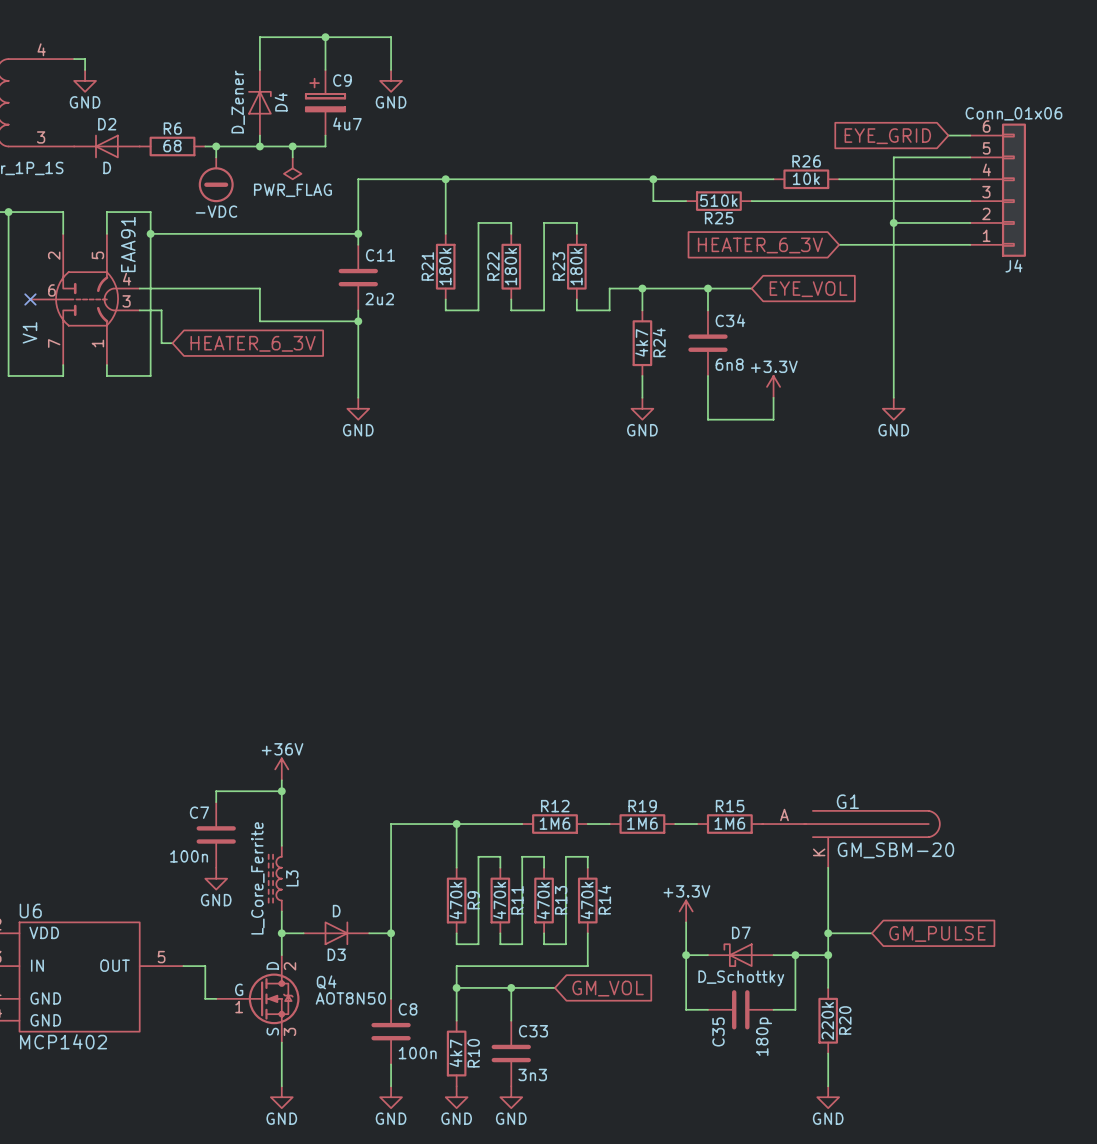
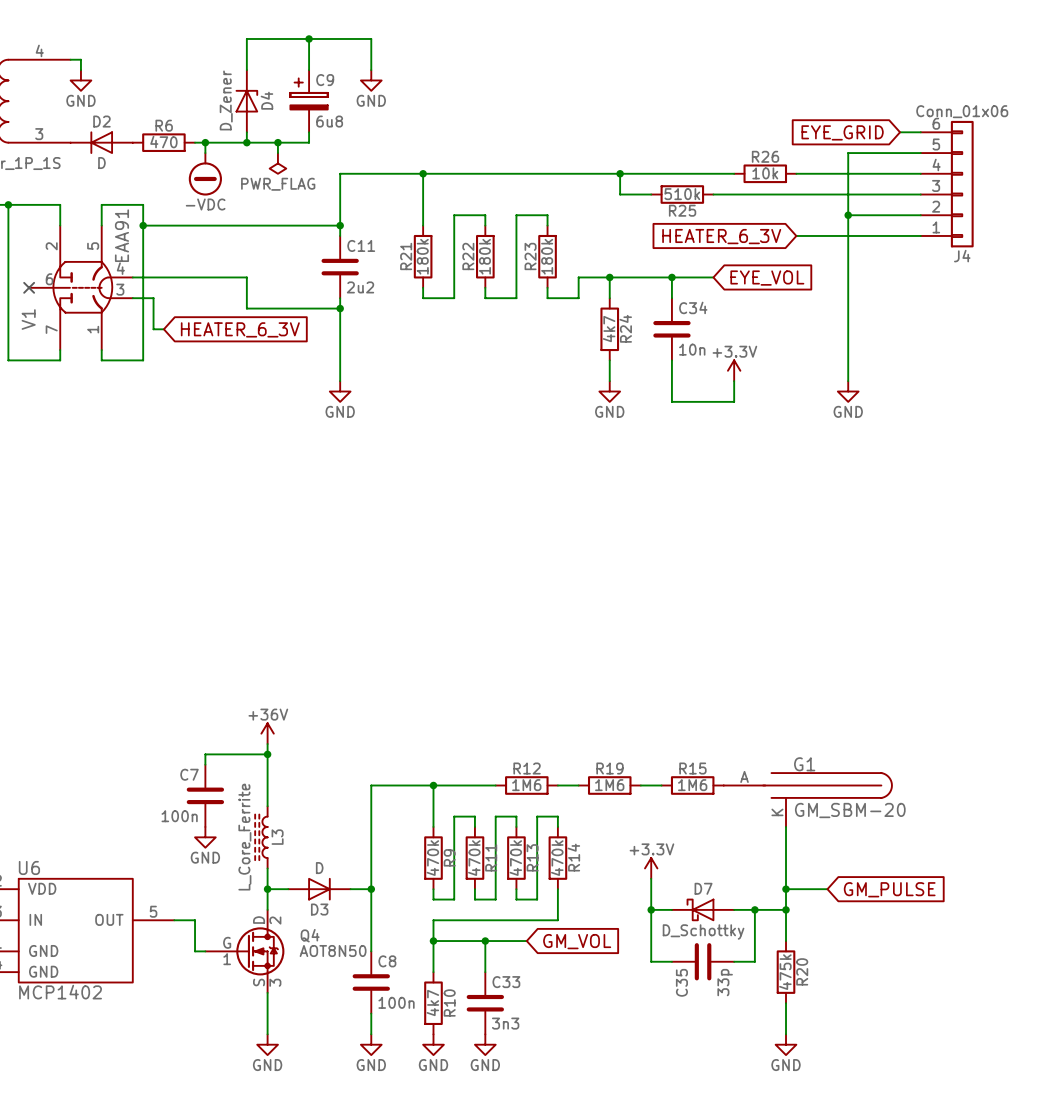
C9 value: 4u7 (347, 123) -> 6u8 (329, 121)
R6 value: 68 (172, 146) -> 470 (163, 142)
C34 value: 6n8 (729, 364) -> 10n (692, 349)
R20 value: 220k (827, 1020) -> 475k (785, 972)
C35 value: 180p (764, 1036) -> 33p (725, 982)

